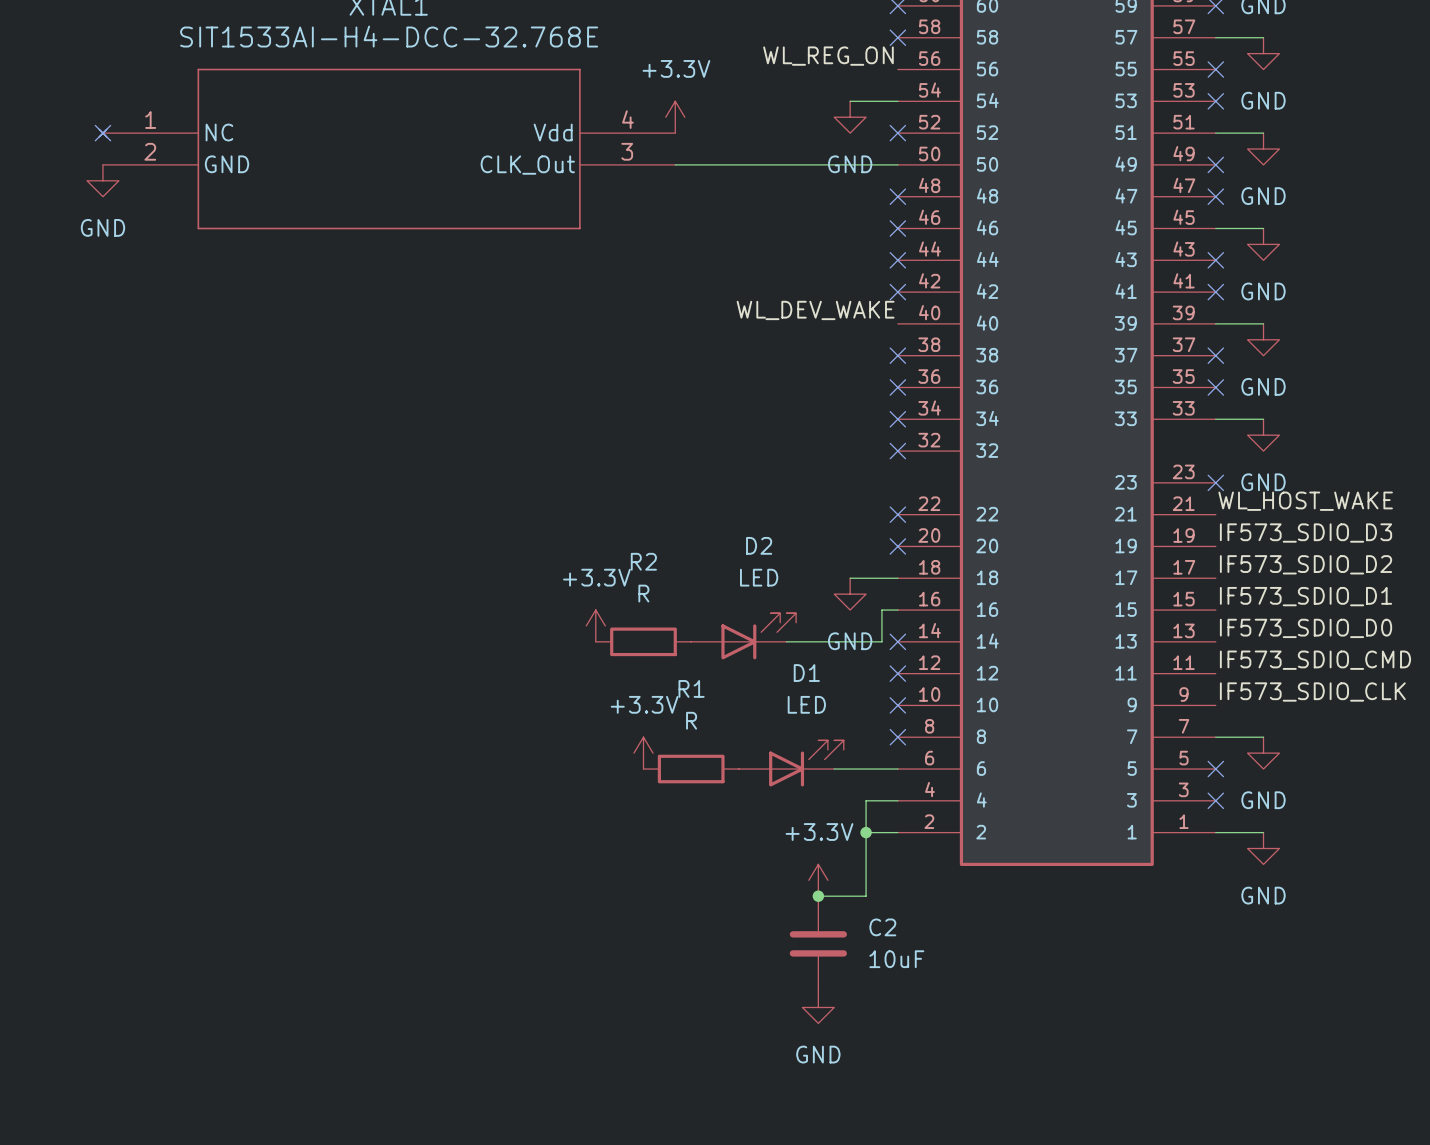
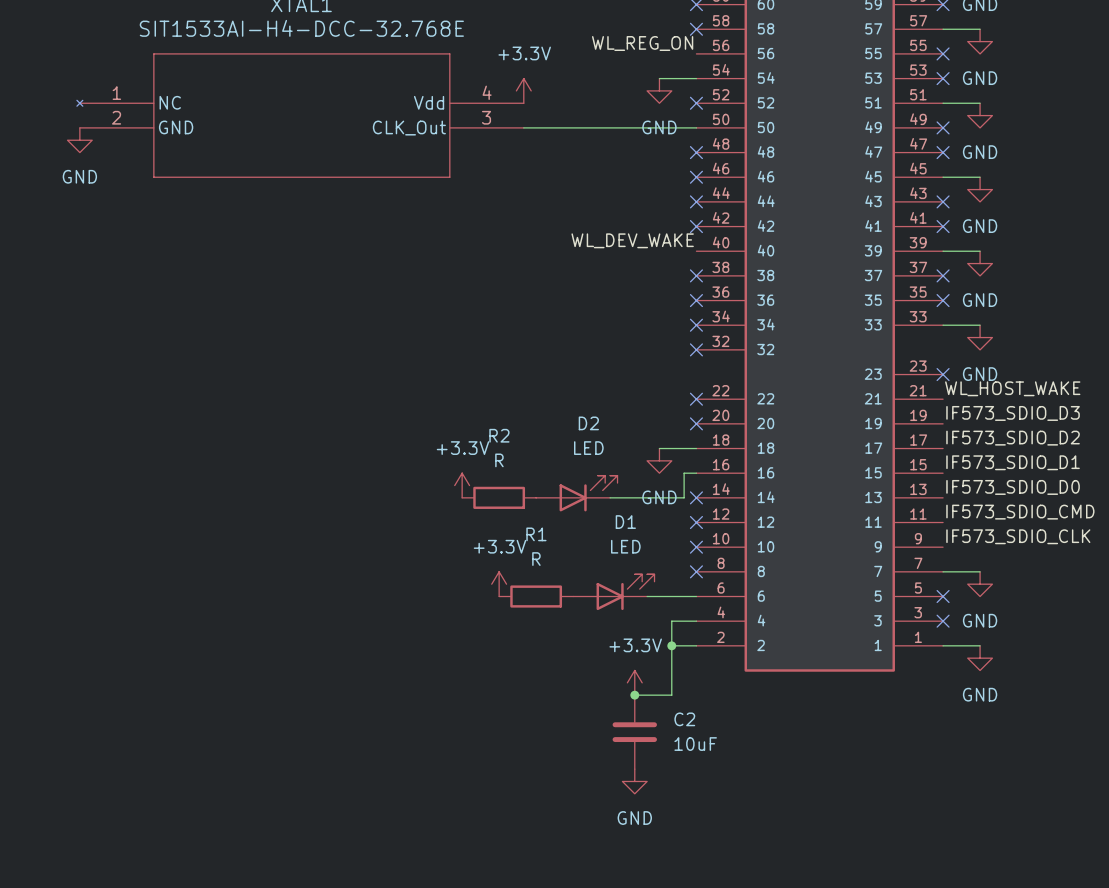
no-connect mark: (102, 133) -> none

